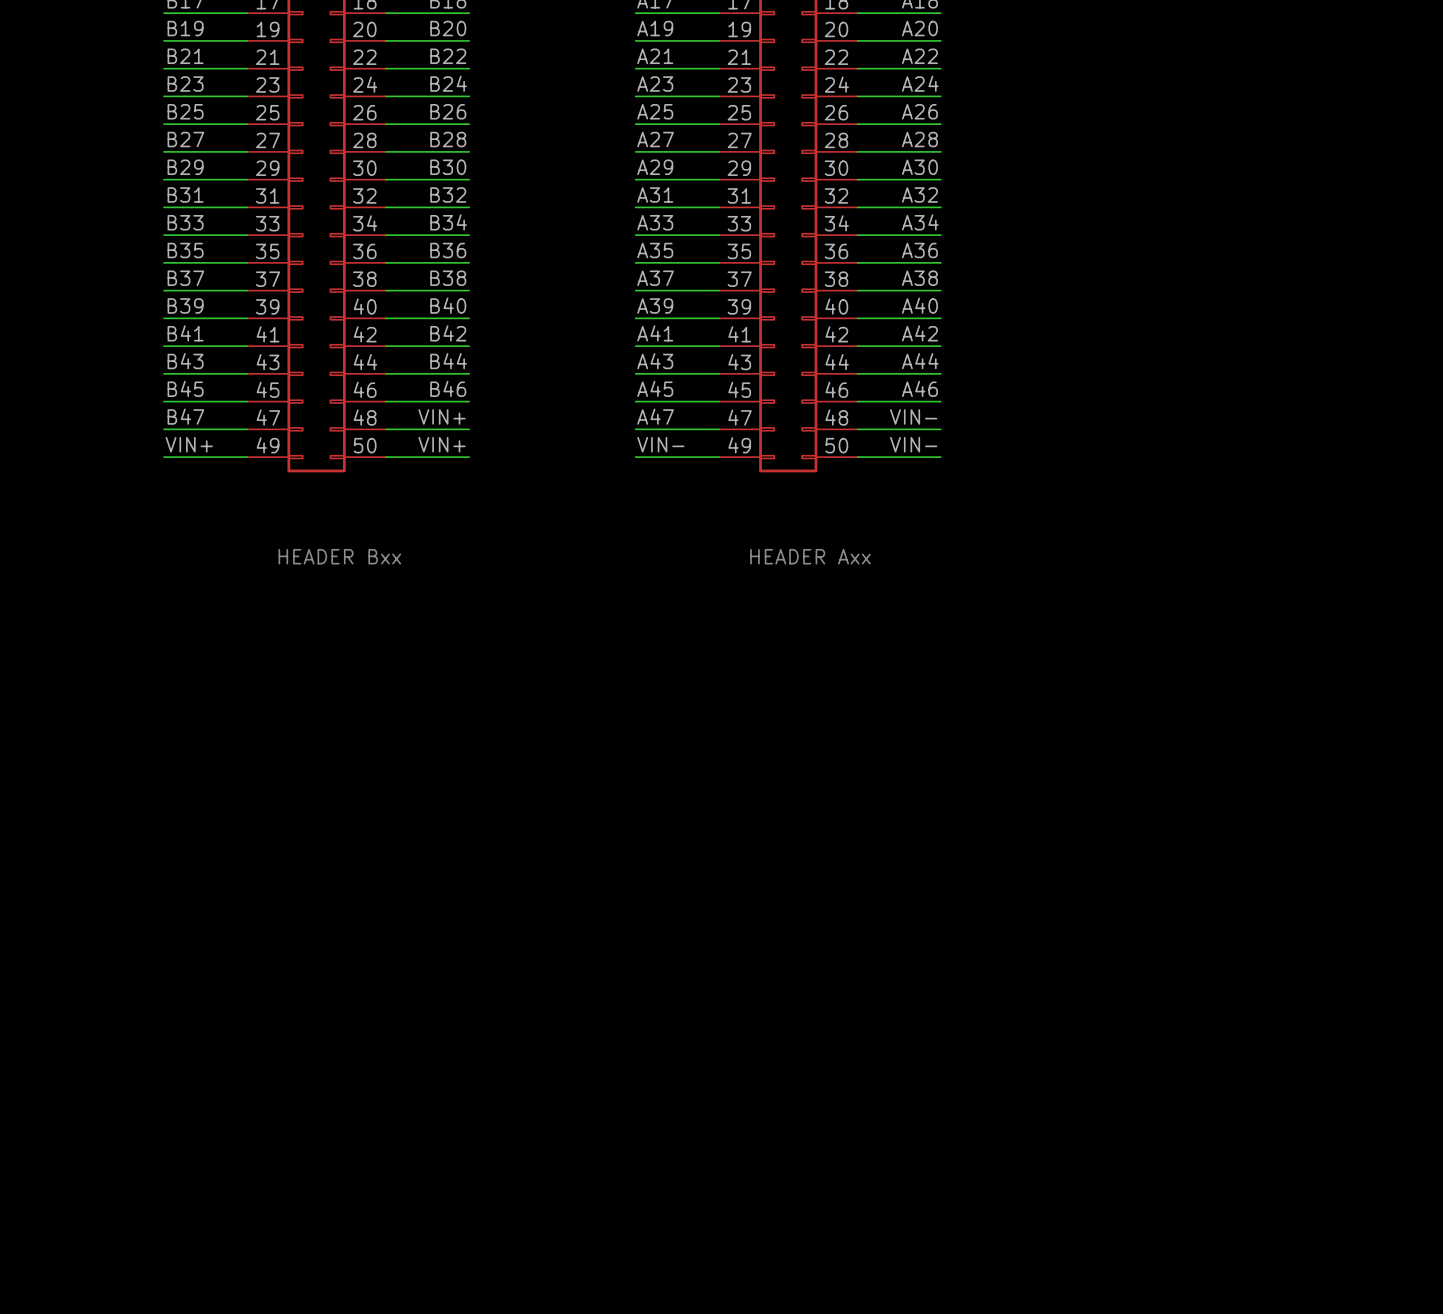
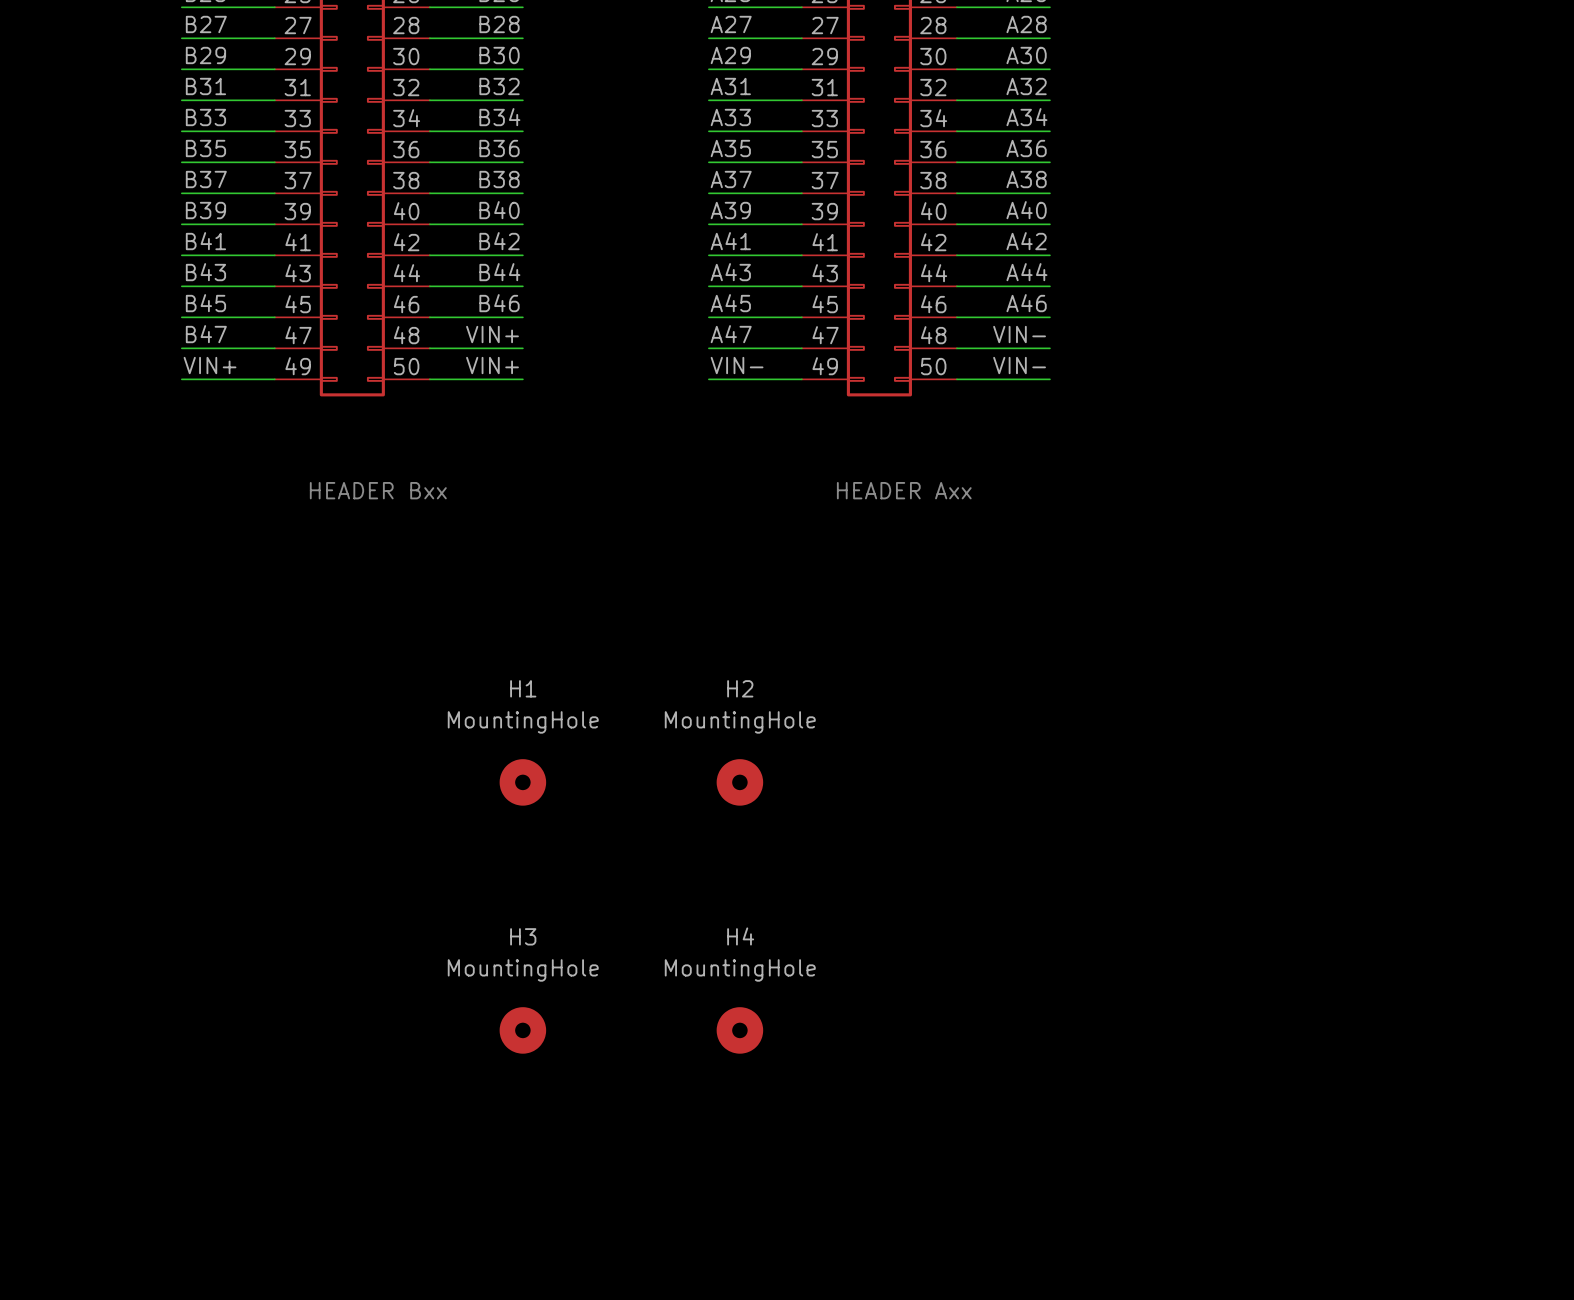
H1: none -> MountingHole (522, 782)
H2: none -> MountingHole (739, 782)
H3: none -> MountingHole (522, 1030)
H4: none -> MountingHole (739, 1030)

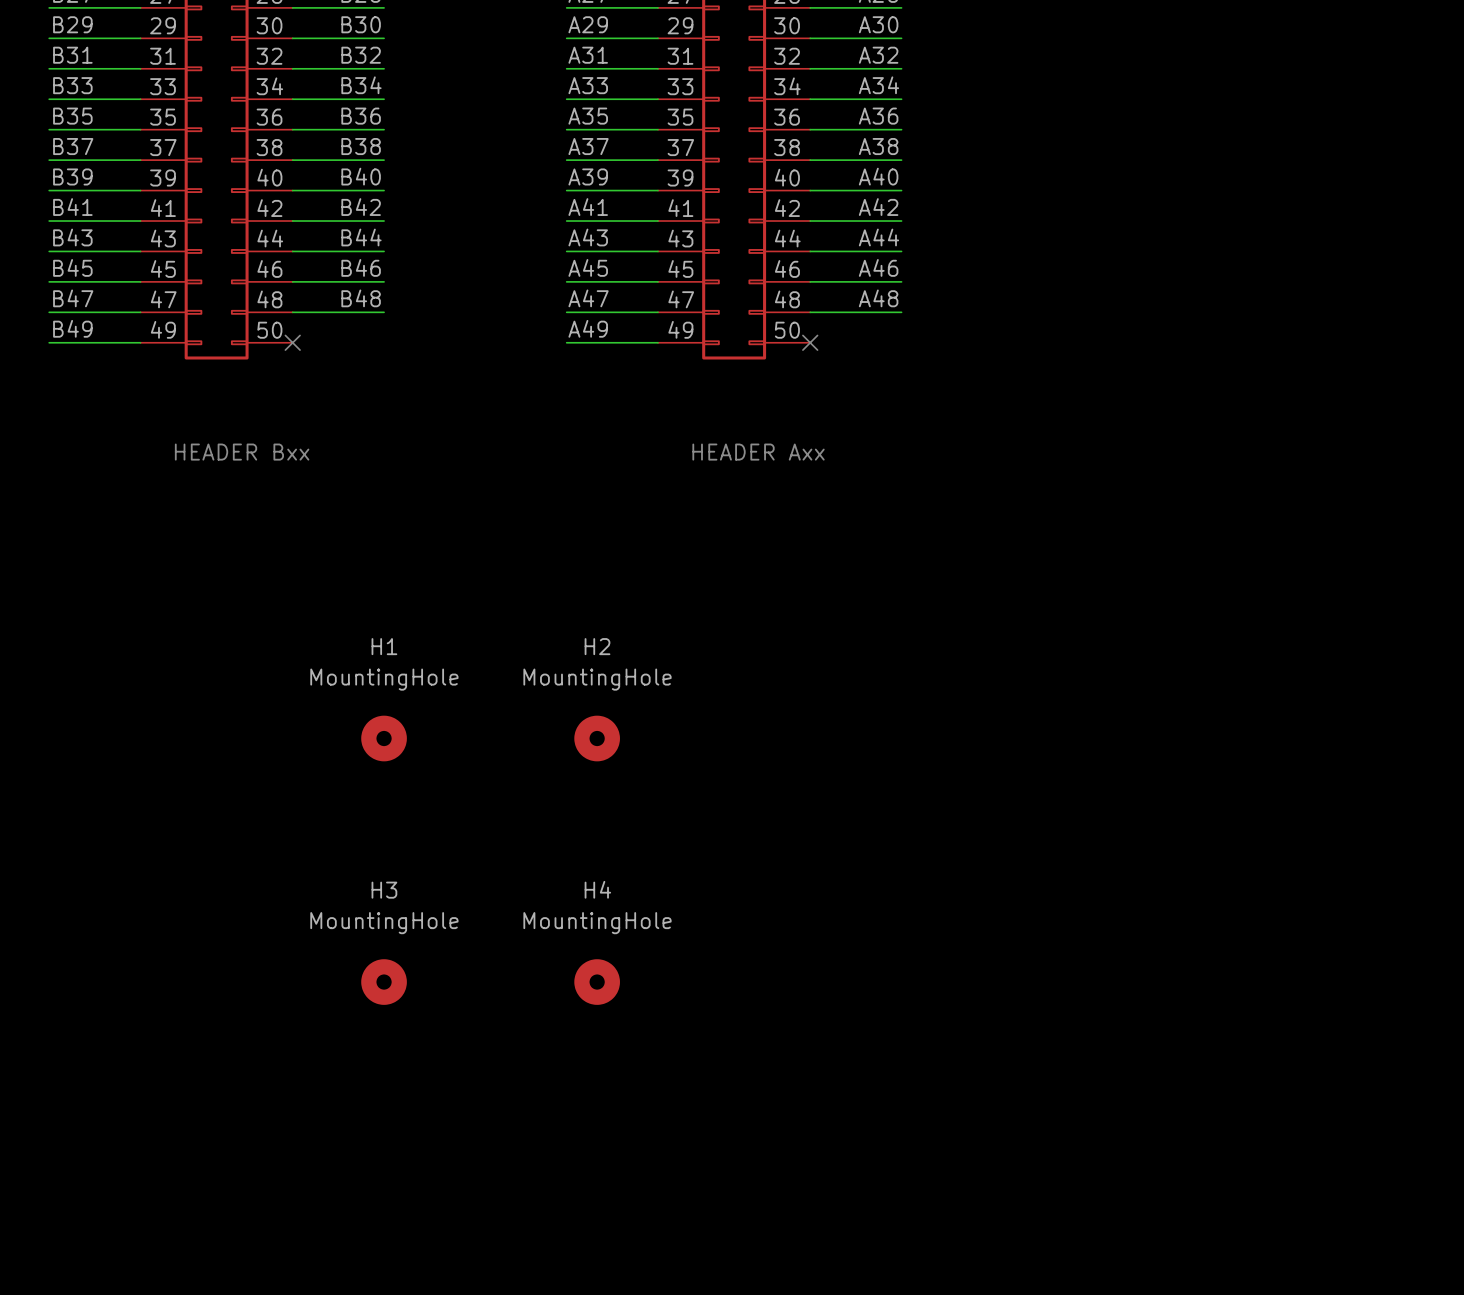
label: VIN+ (492, 334) -> B48 (361, 298)
label: VIN- (1019, 334) -> A48 (878, 298)
label: VIN+ (210, 365) -> B49 (72, 328)
label: VIN+ (492, 365) -> none
label: VIN- (737, 365) -> A49 (588, 328)
label: VIN- (1019, 365) -> none
wire: (429, 379) (522, 379) -> none
no-connect mark: none -> (292, 342)
wire: (956, 379) (1049, 379) -> none
no-connect mark: none -> (810, 342)

